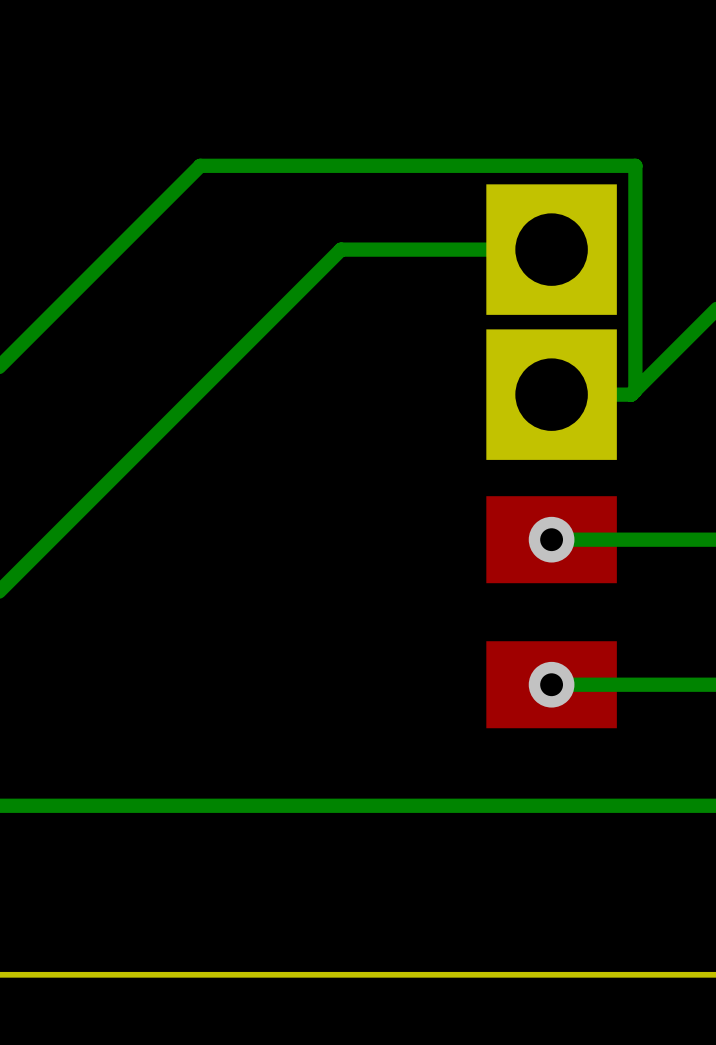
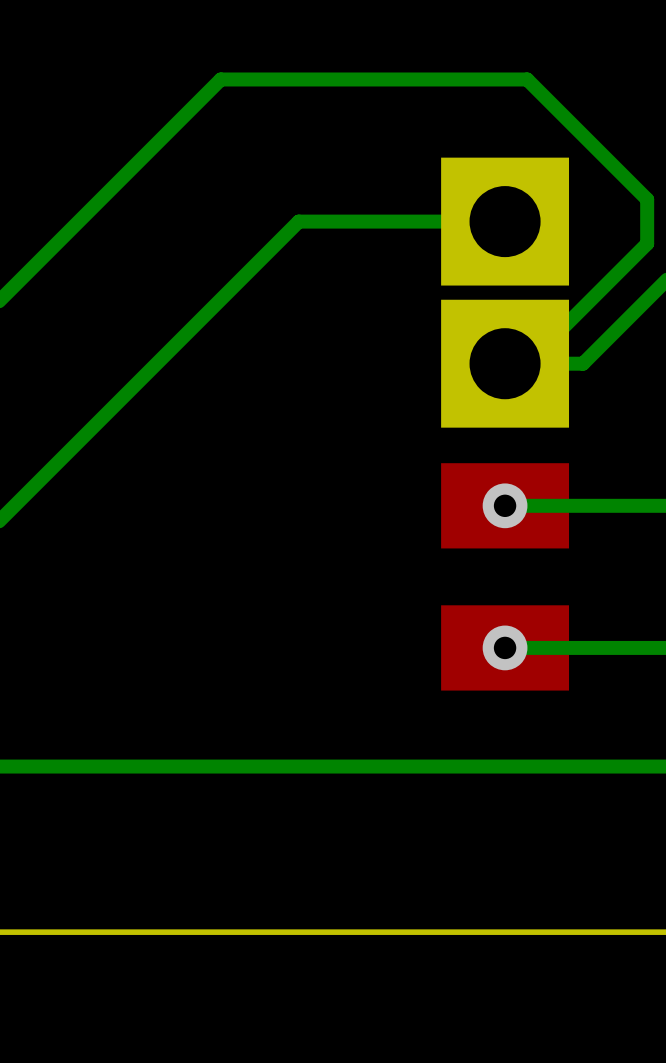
bottom track: (200, 165) (635, 165) (635, 390) -> (160, 139) (220, 79) (527, 79) (647, 199) (647, 243) (527, 363)

